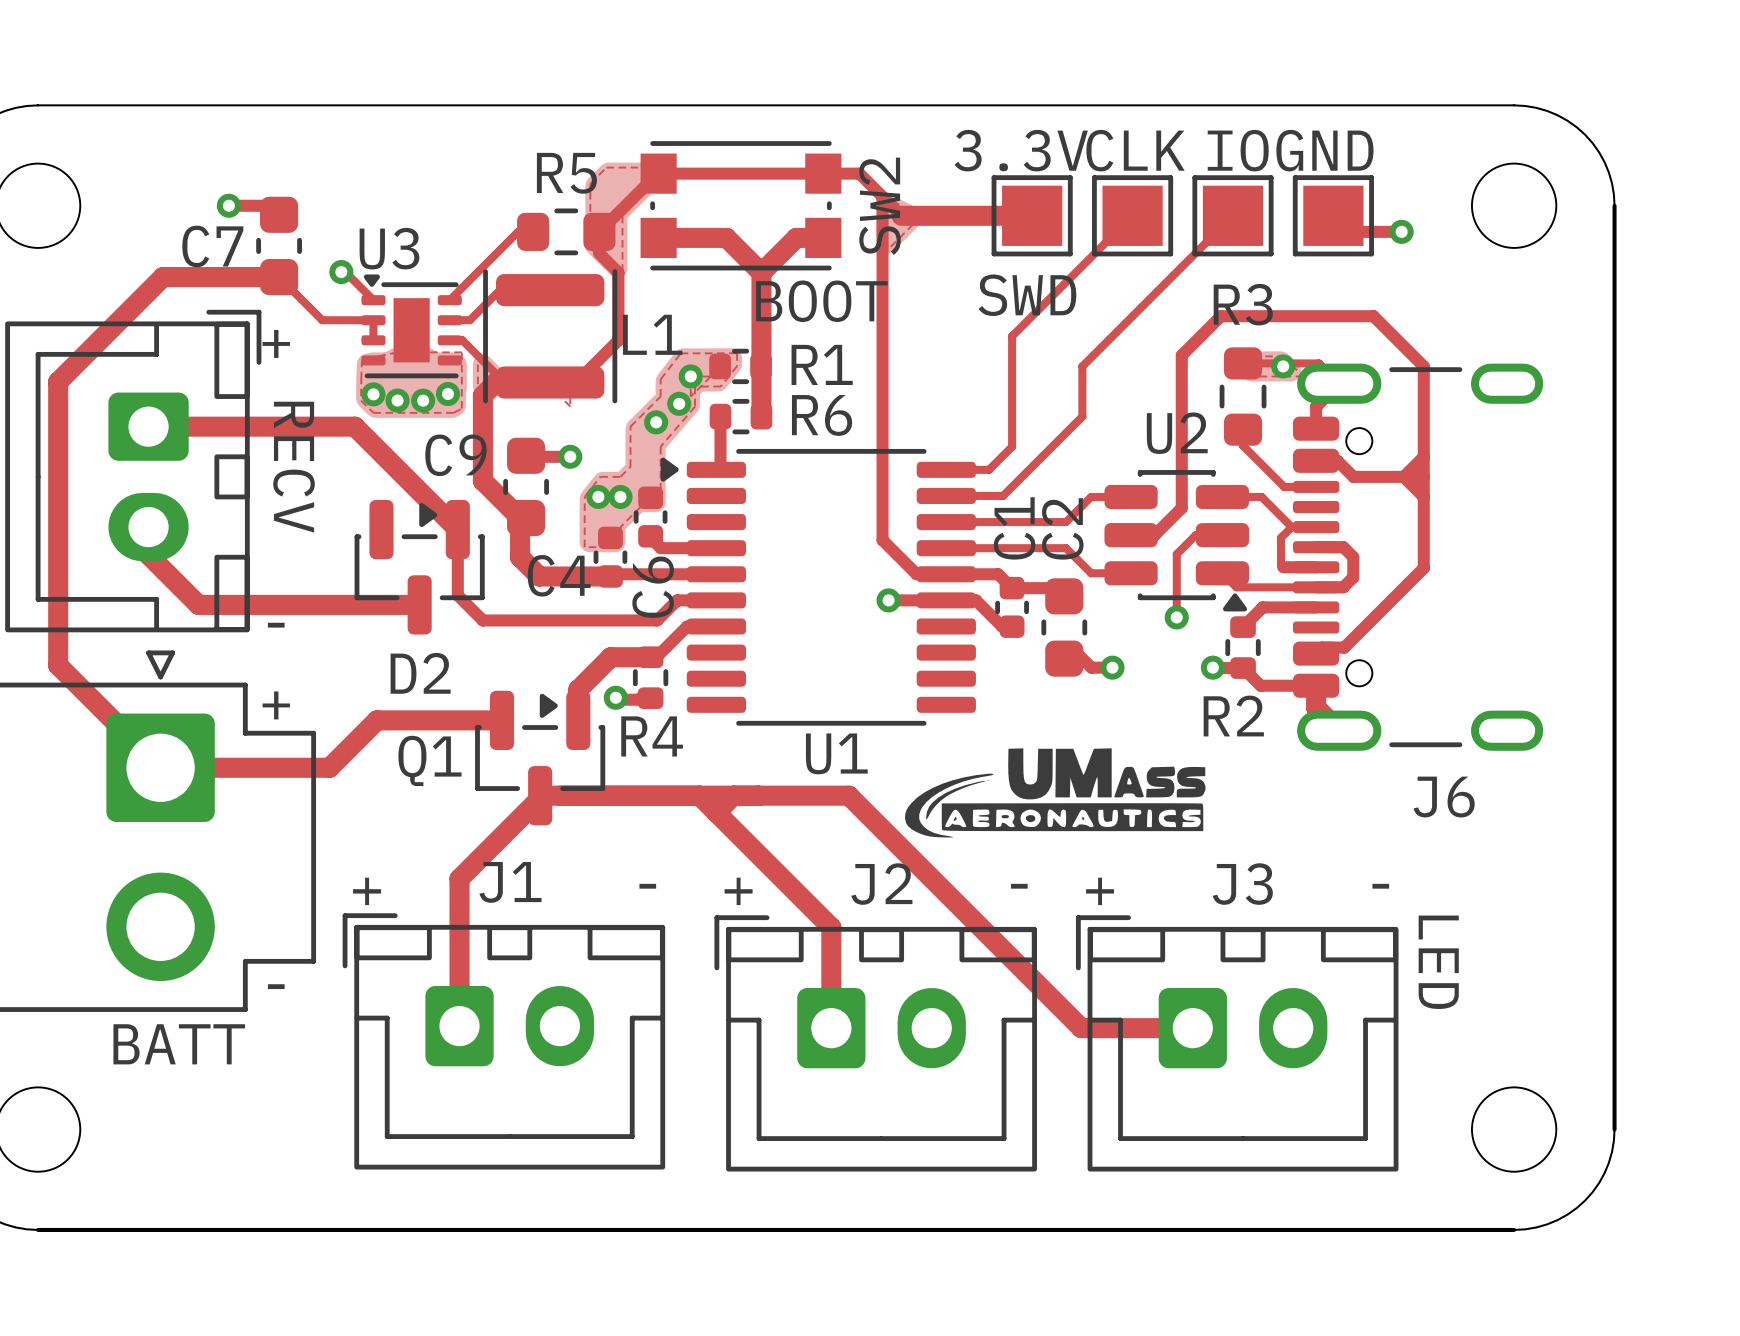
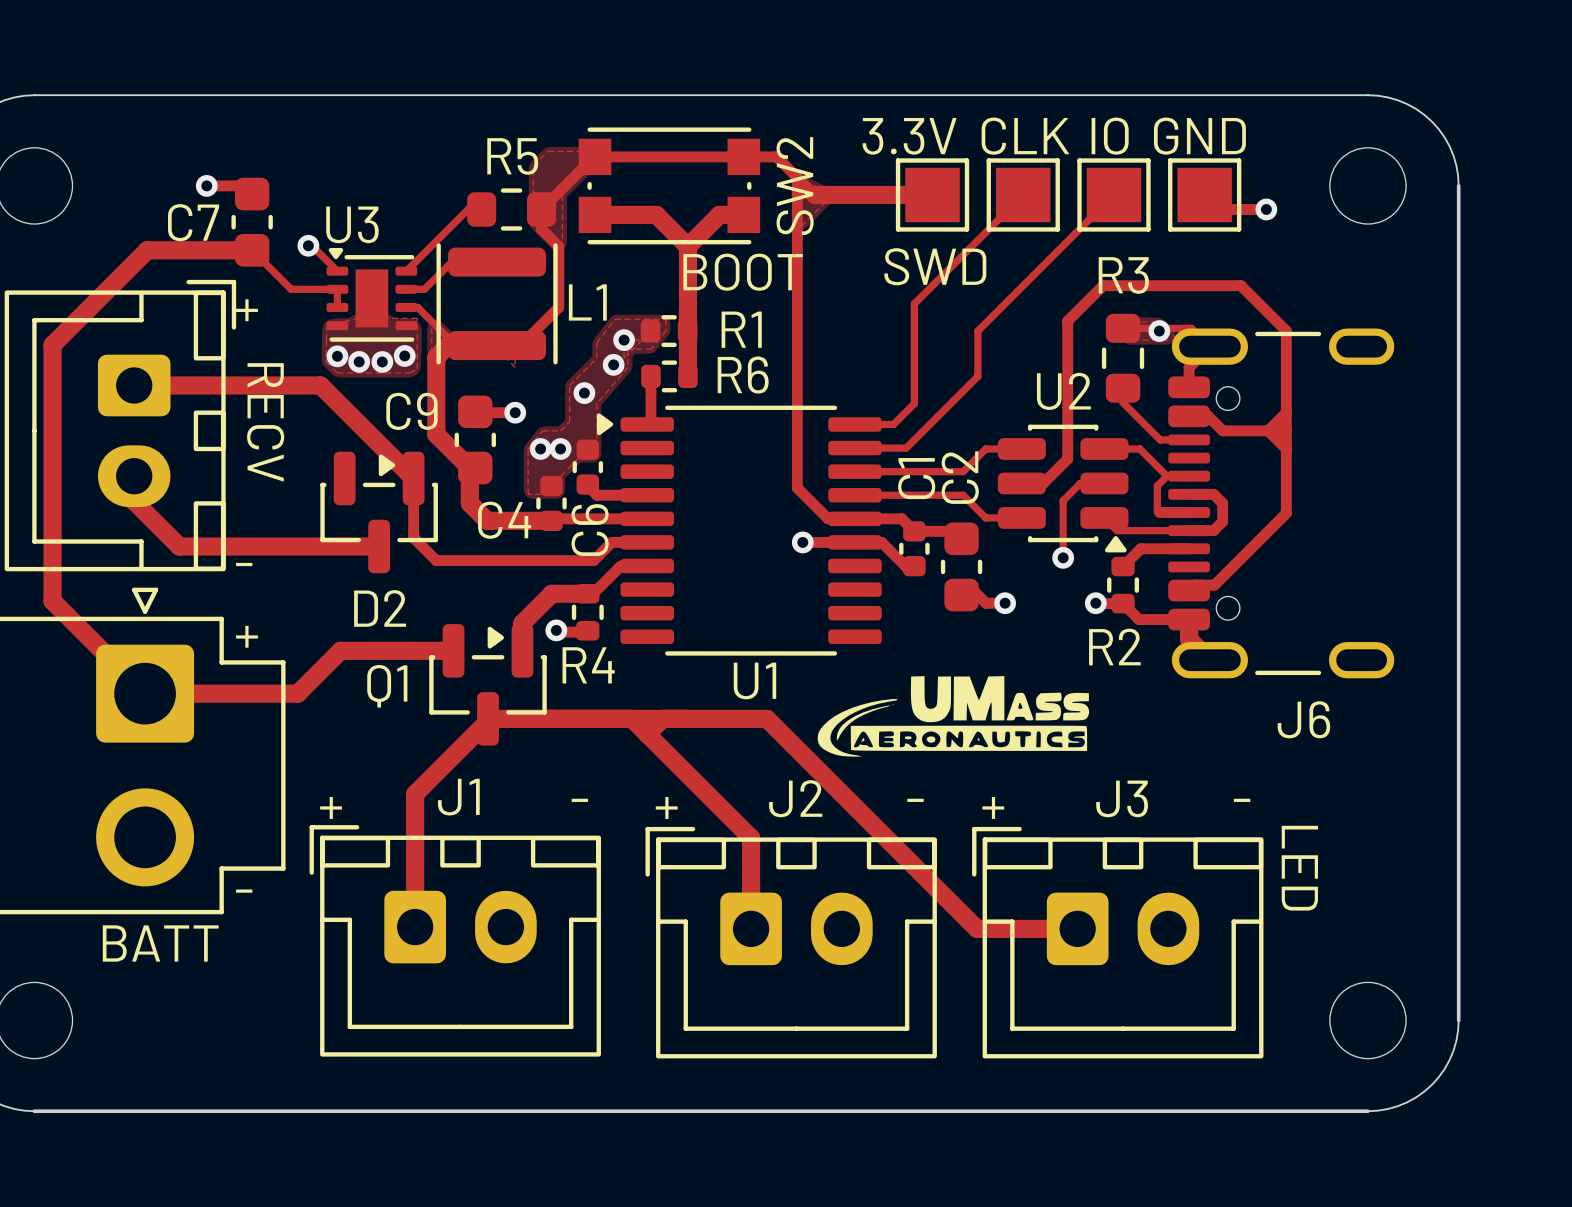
via position: (656, 422) -> (584, 393)

